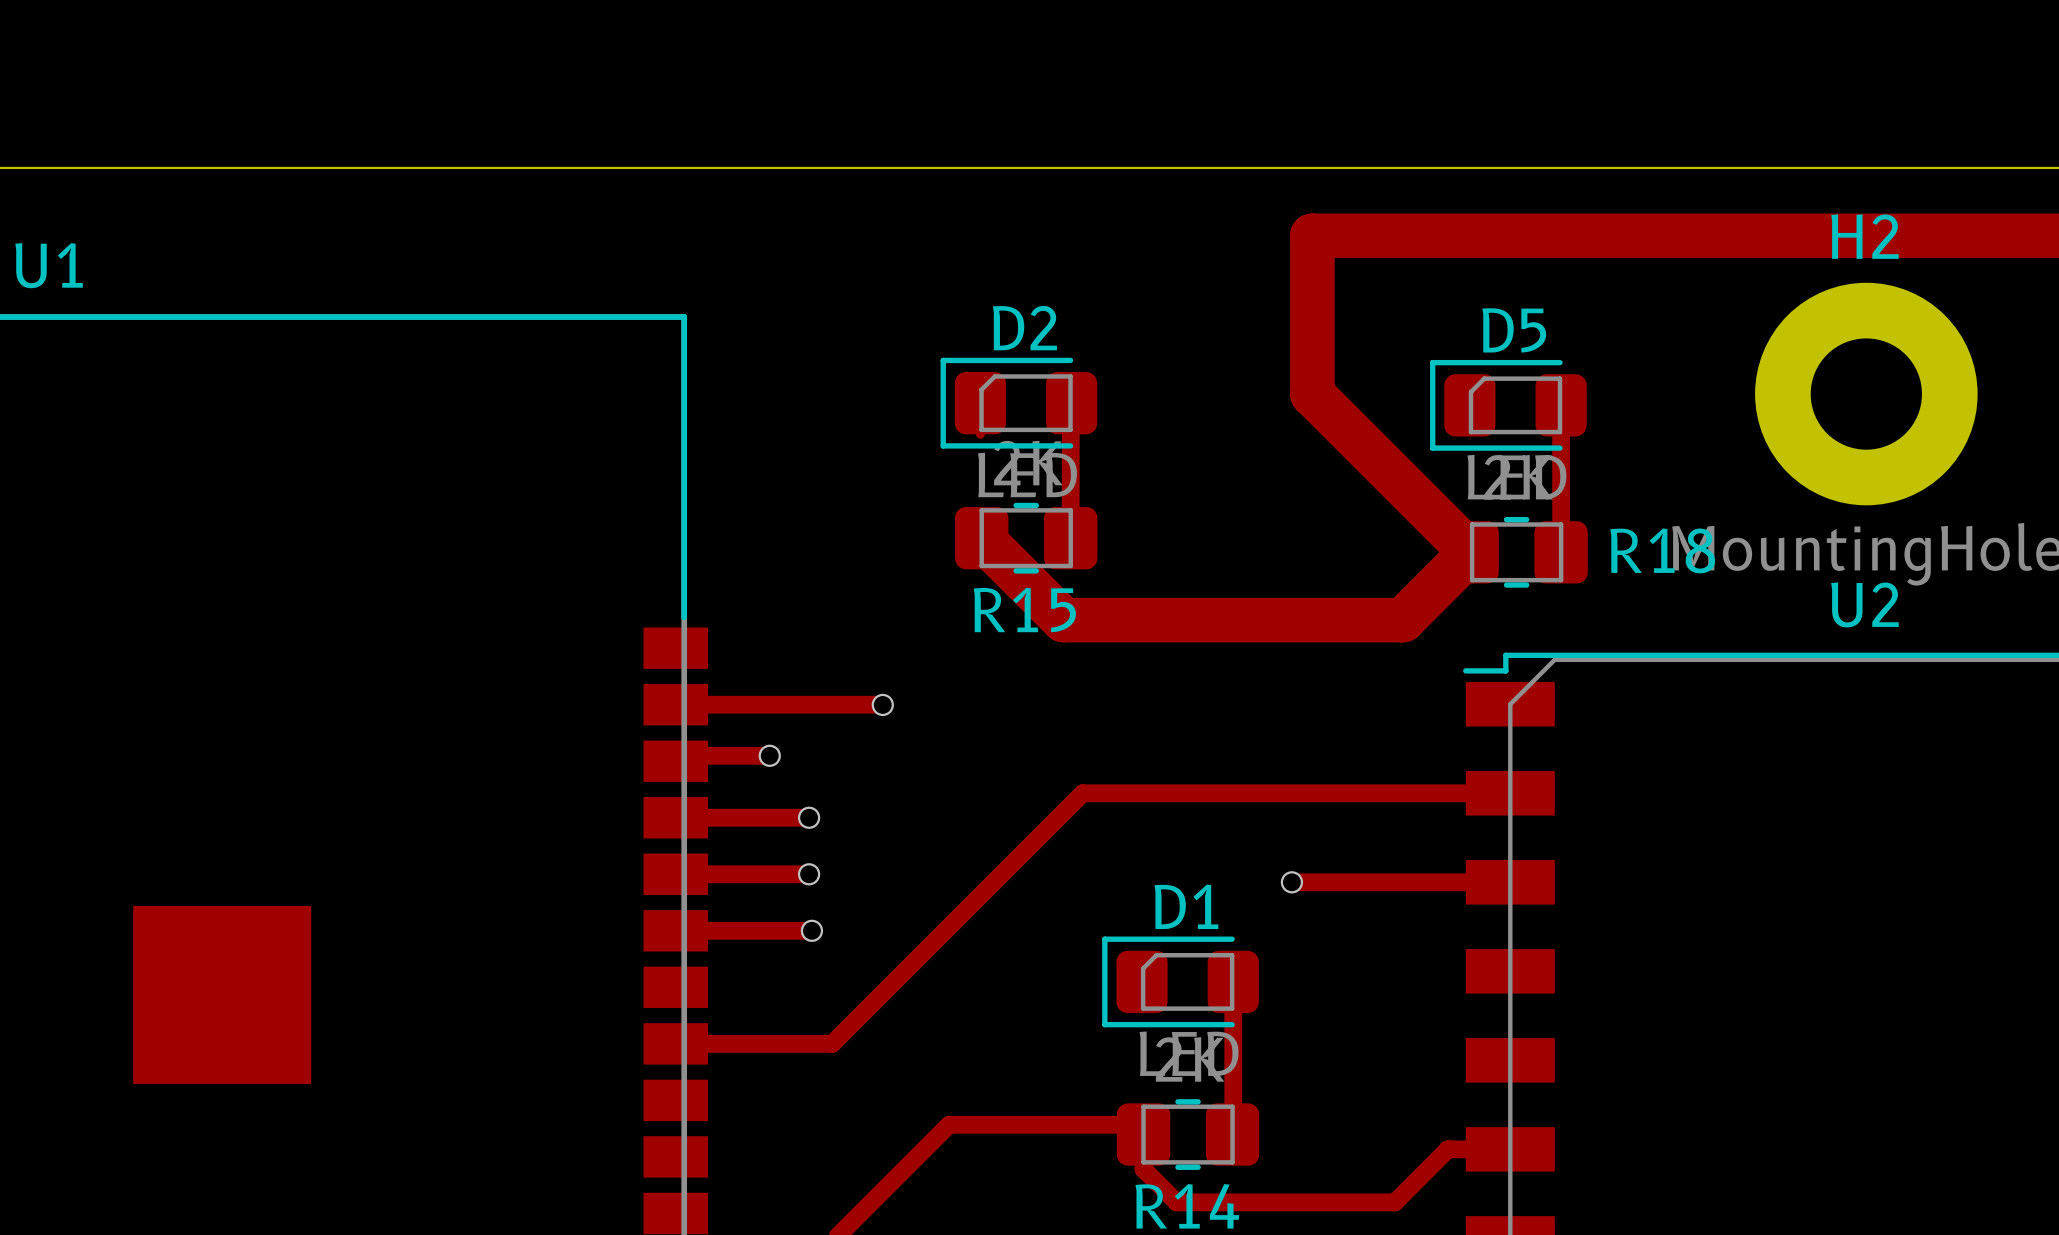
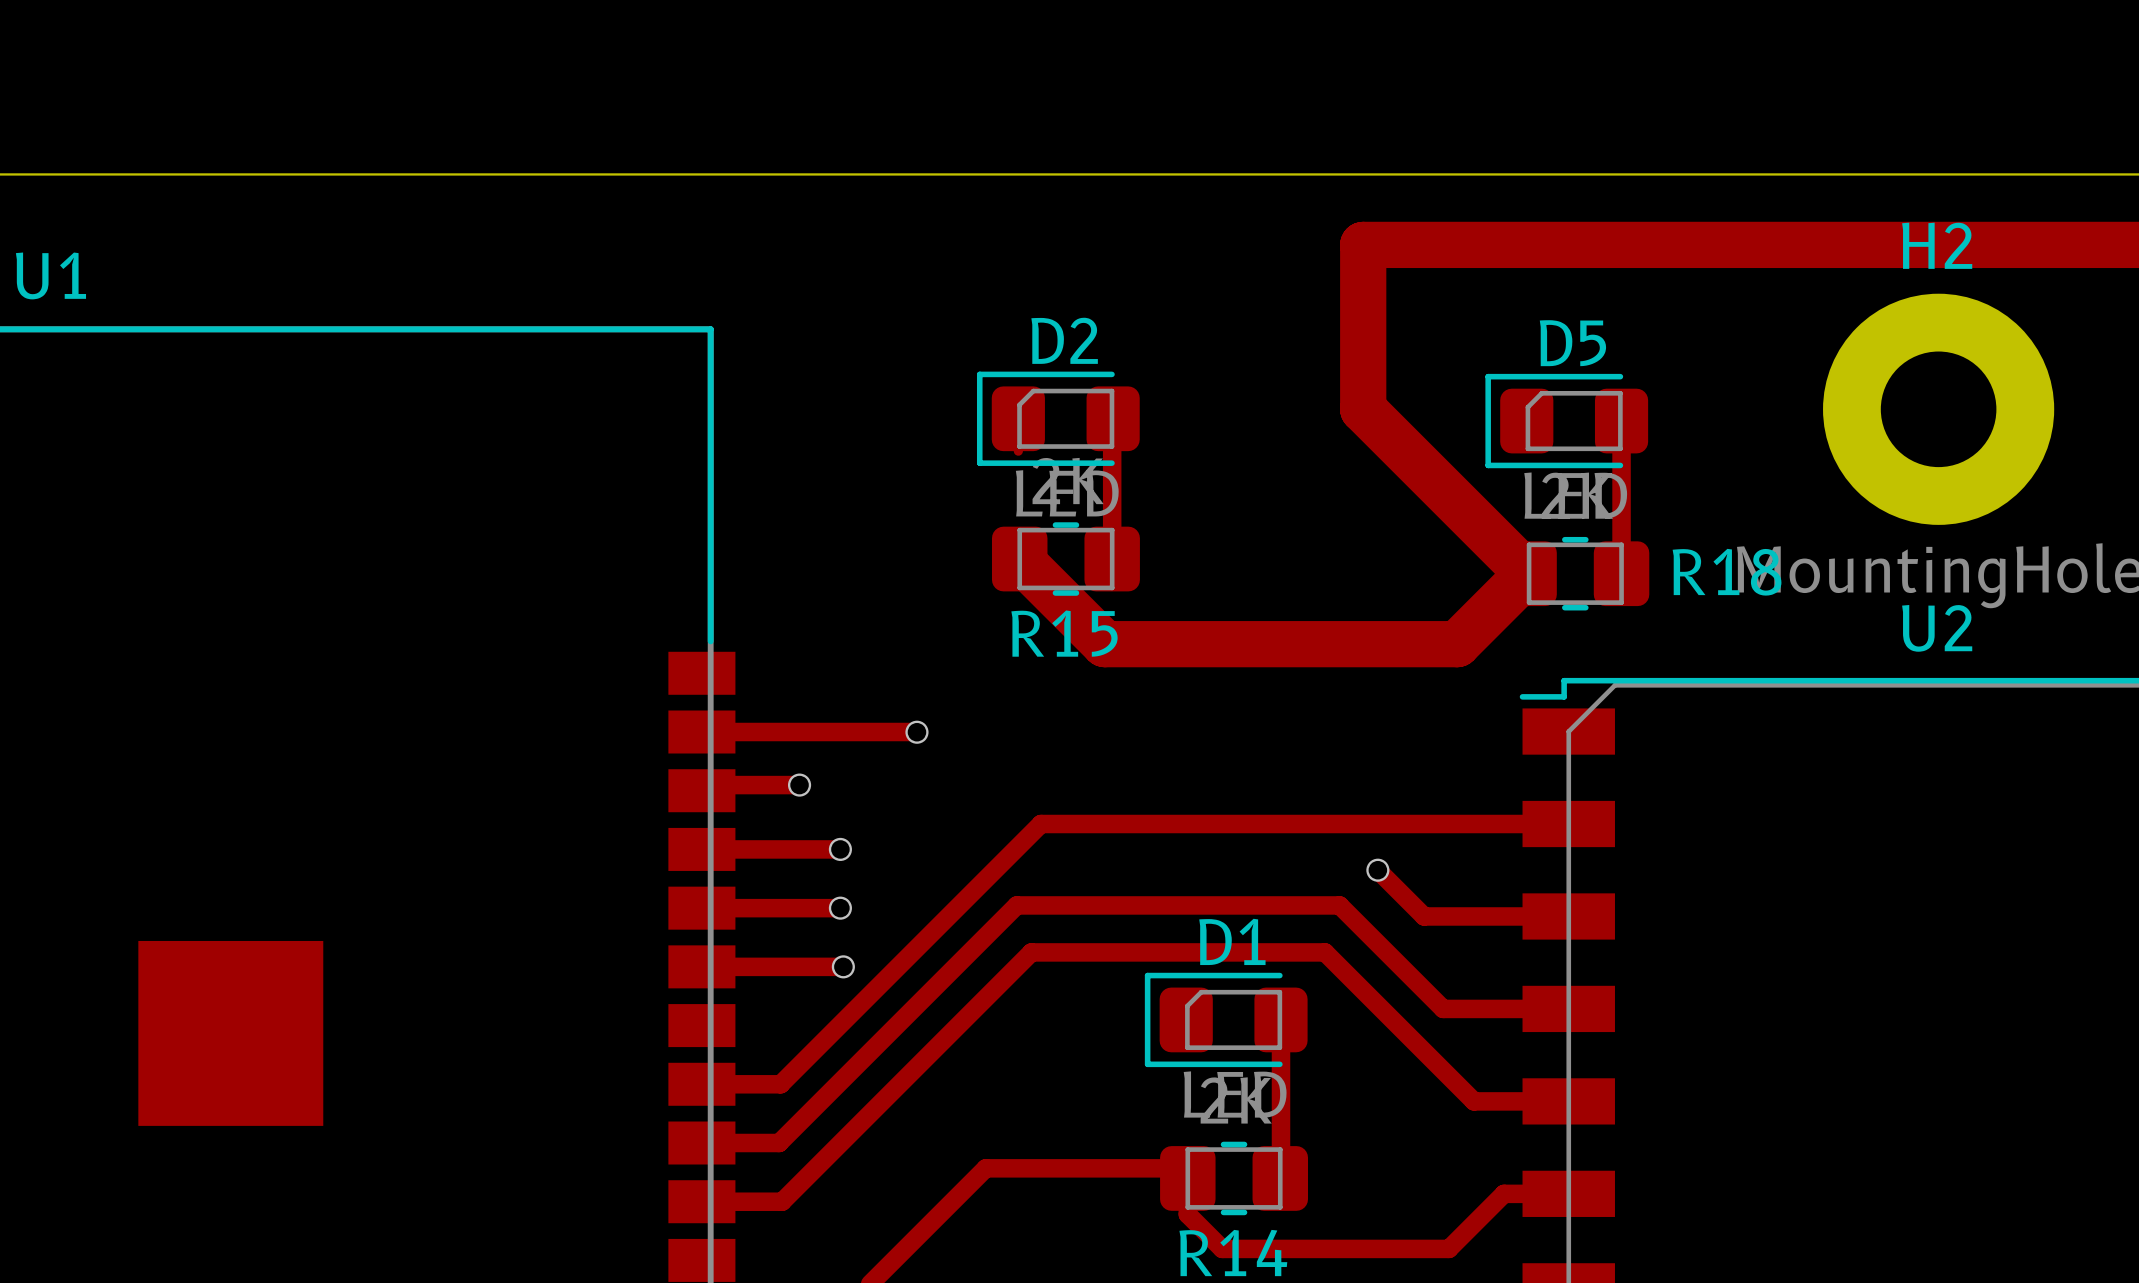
track: (1082, 793) (832, 1043) (751, 1043) -> (1124, 824) (1041, 824) (780, 1084)
track: (1291, 882) (1371, 882) -> (1377, 870) (1424, 916)
via position: (1291, 882) -> (1377, 870)
track: none -> (1568, 1008) (1443, 1008) (1339, 905) (1016, 905) (779, 1143) (701, 1143)
track: none -> (1568, 1101) (1474, 1101) (1325, 952) (1031, 952) (782, 1201) (701, 1201)

